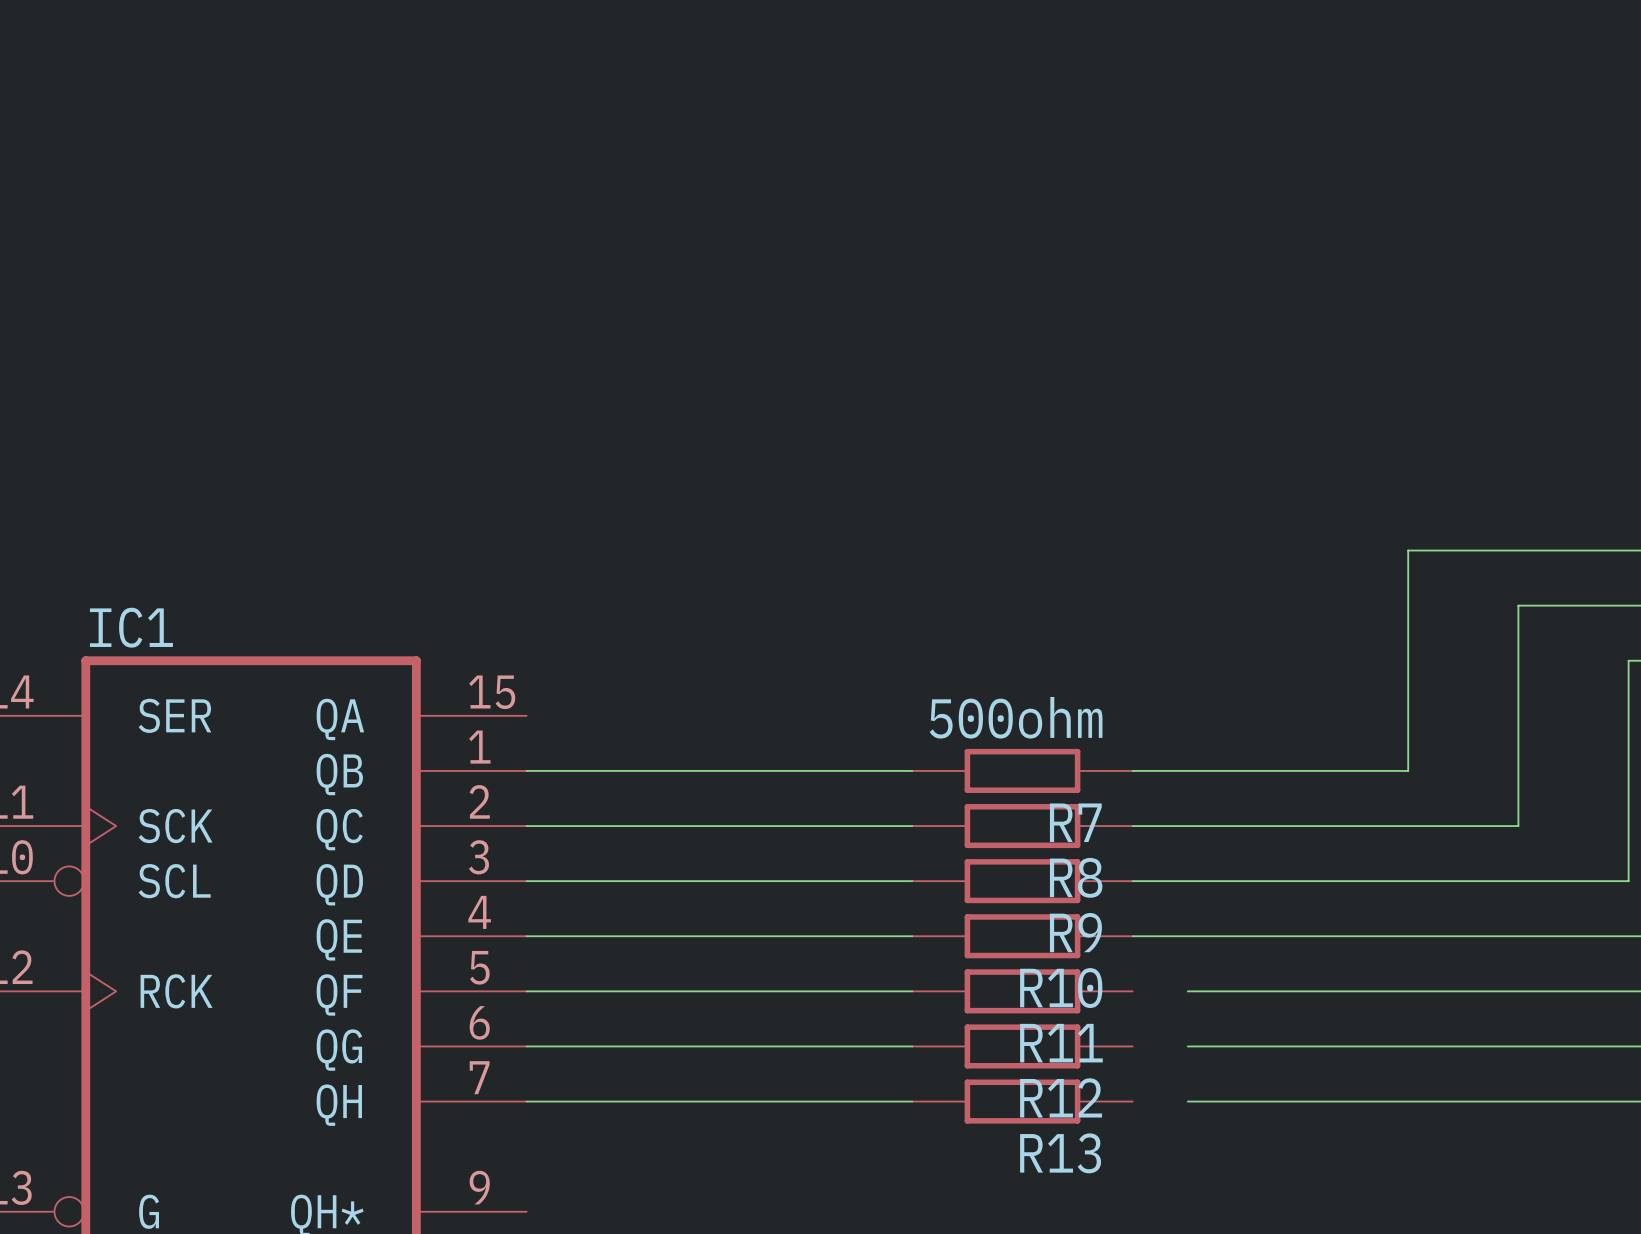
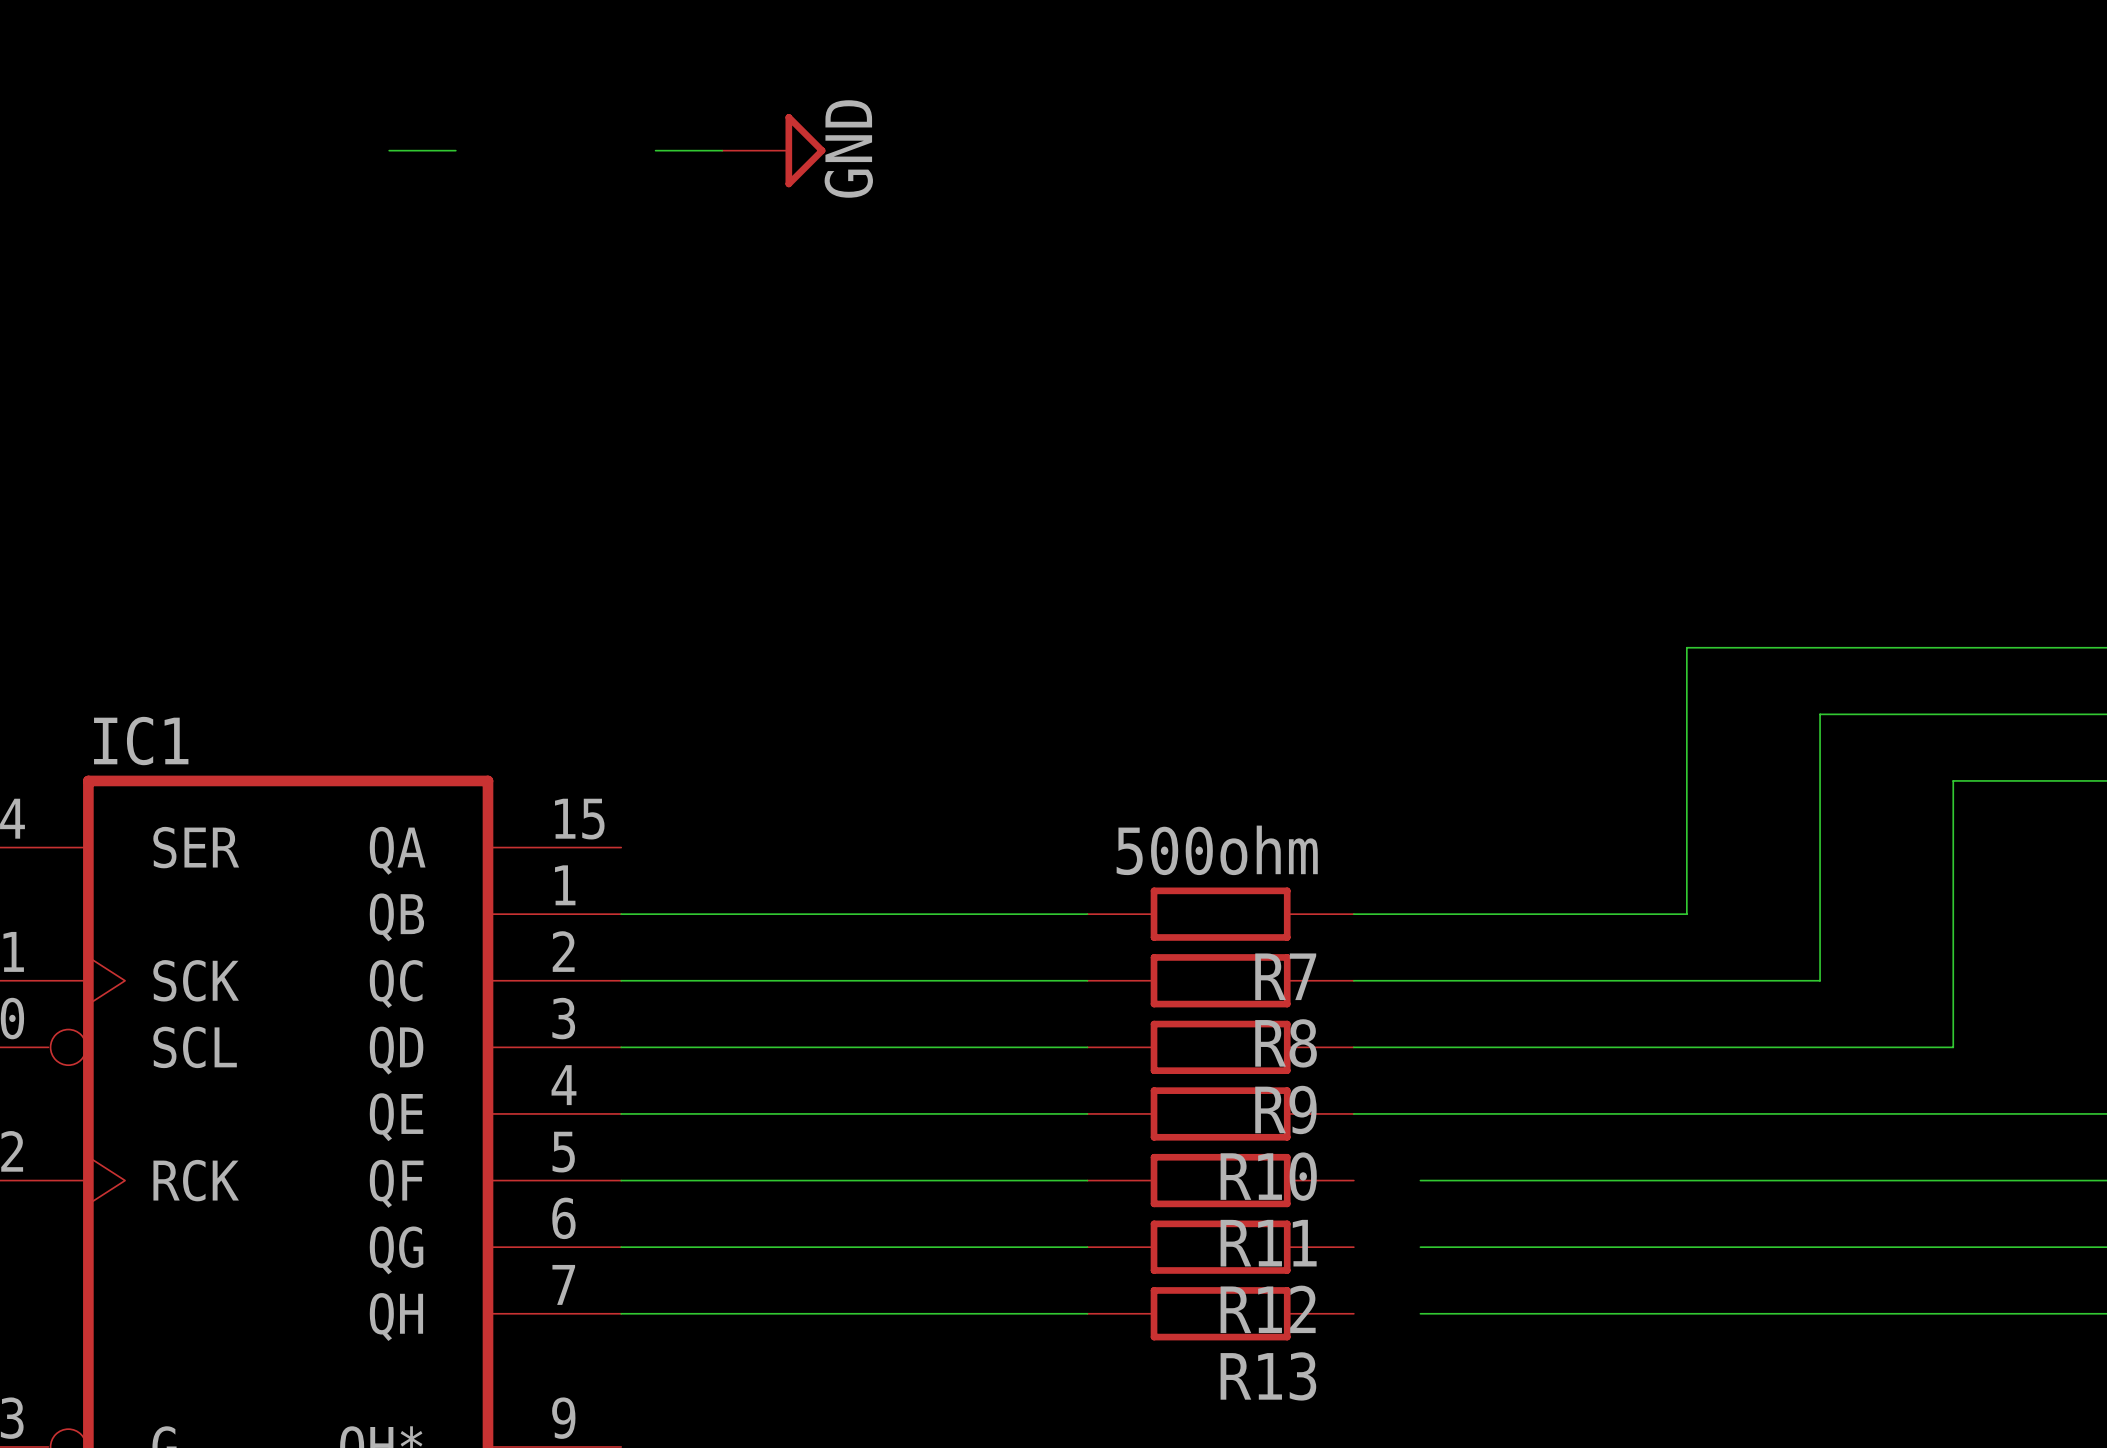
wire: none -> (389, 150) (455, 150)
wire: none -> (655, 150) (722, 150)
power symbol: none -> GND (773, 150)

